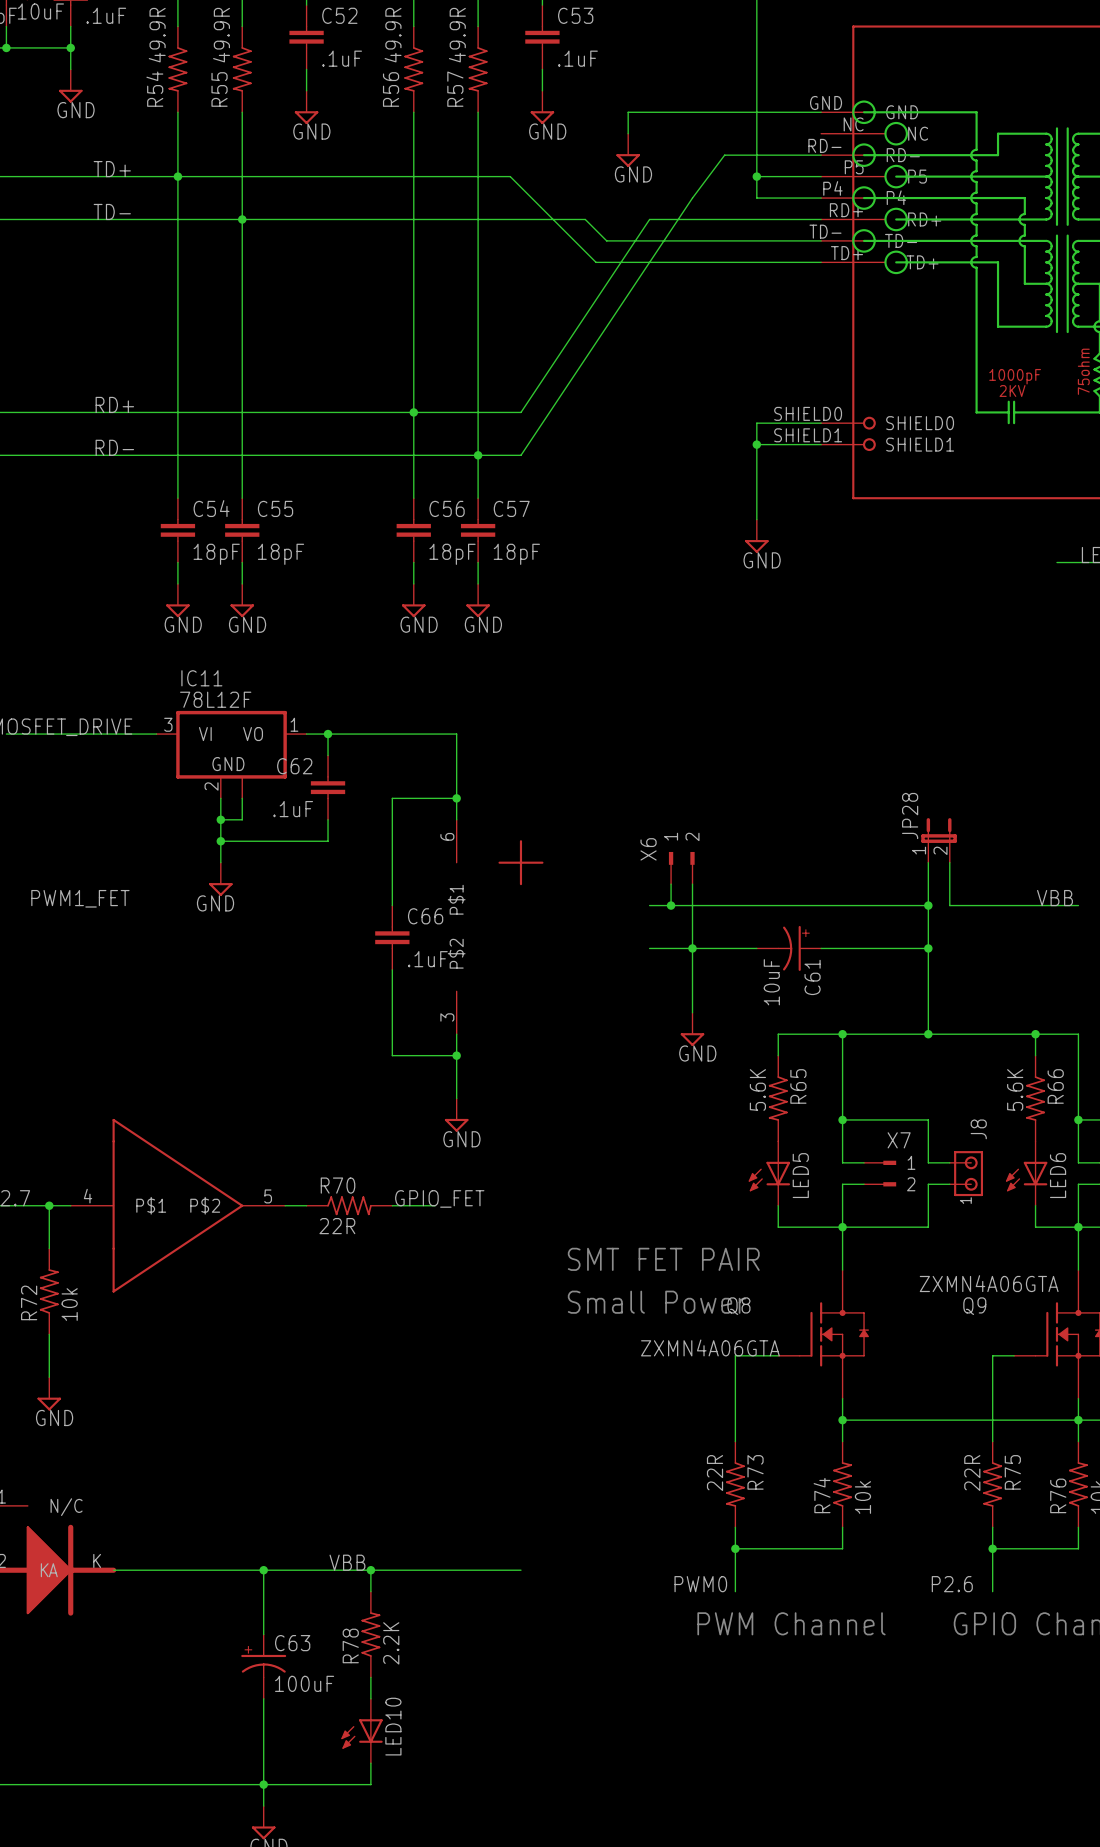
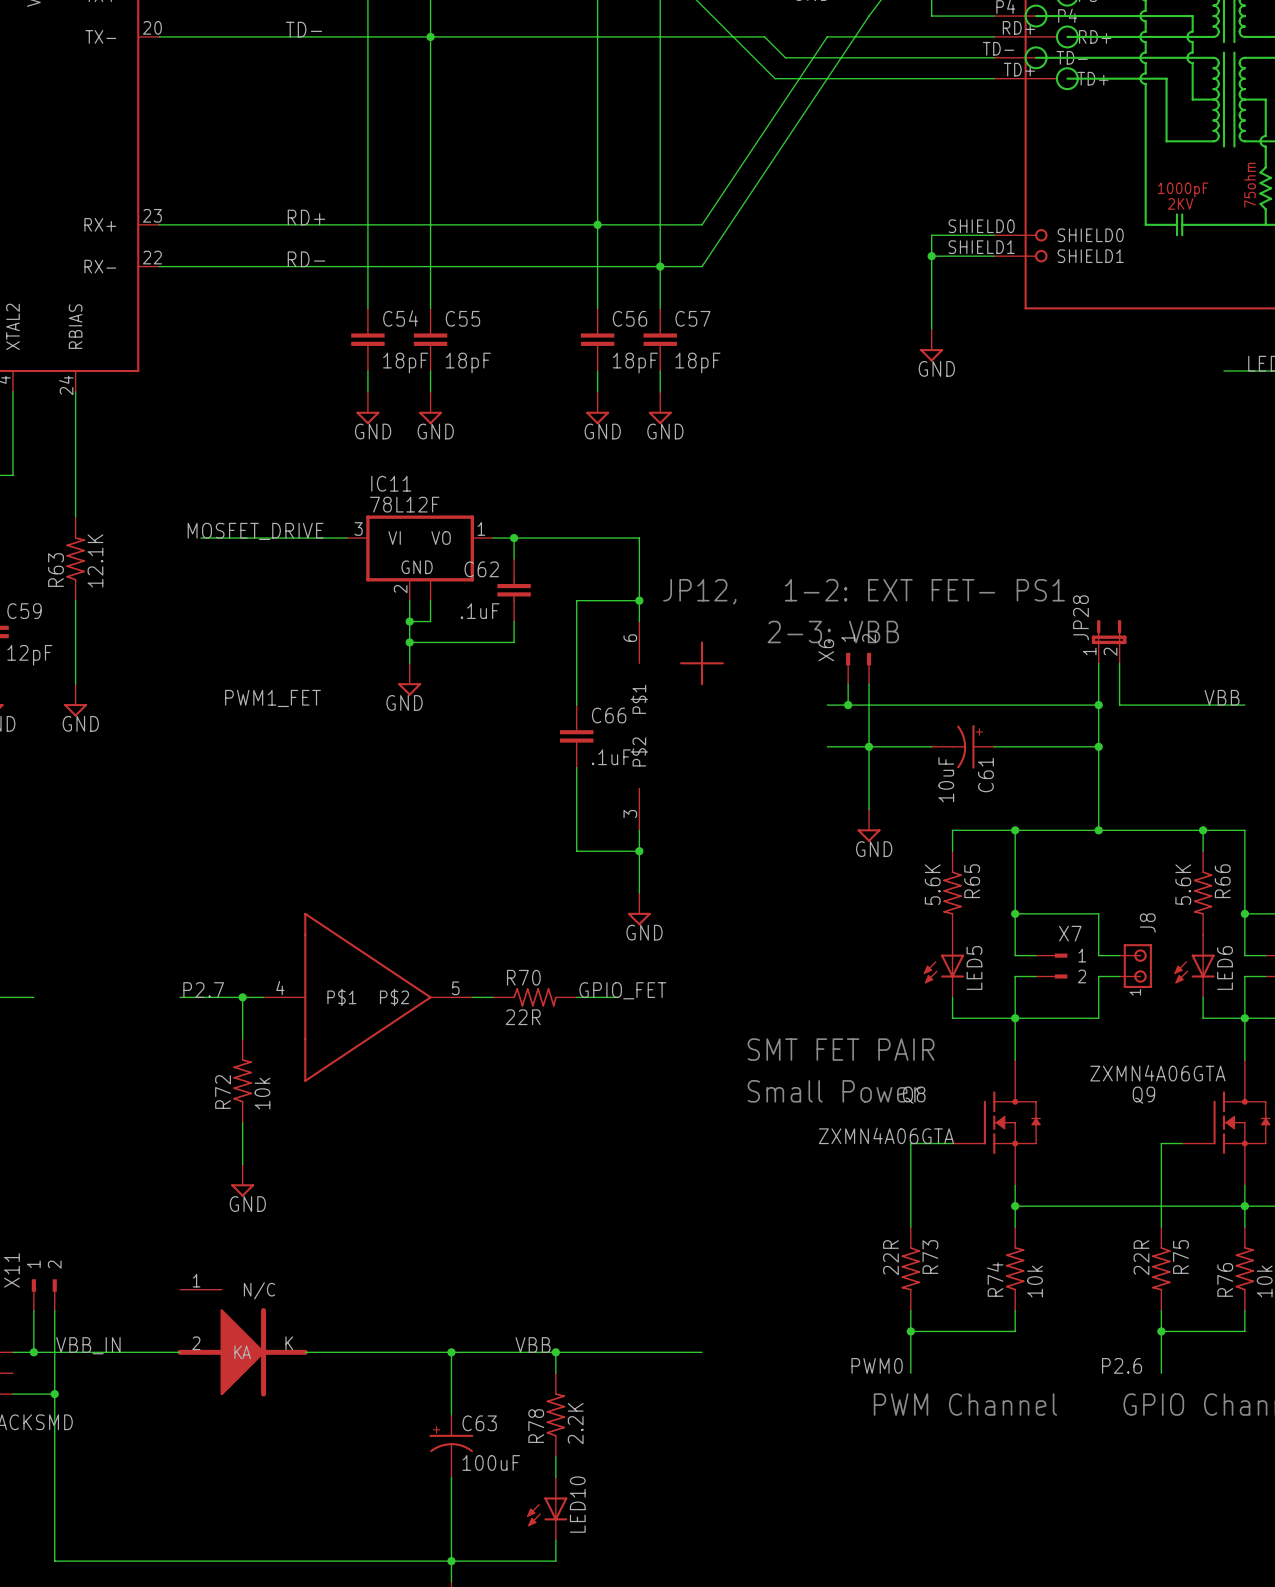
text: none -> JP12, 1-2: EXT FET- PS1 (864, 591)
text: none -> 2-3: VBB (833, 631)

